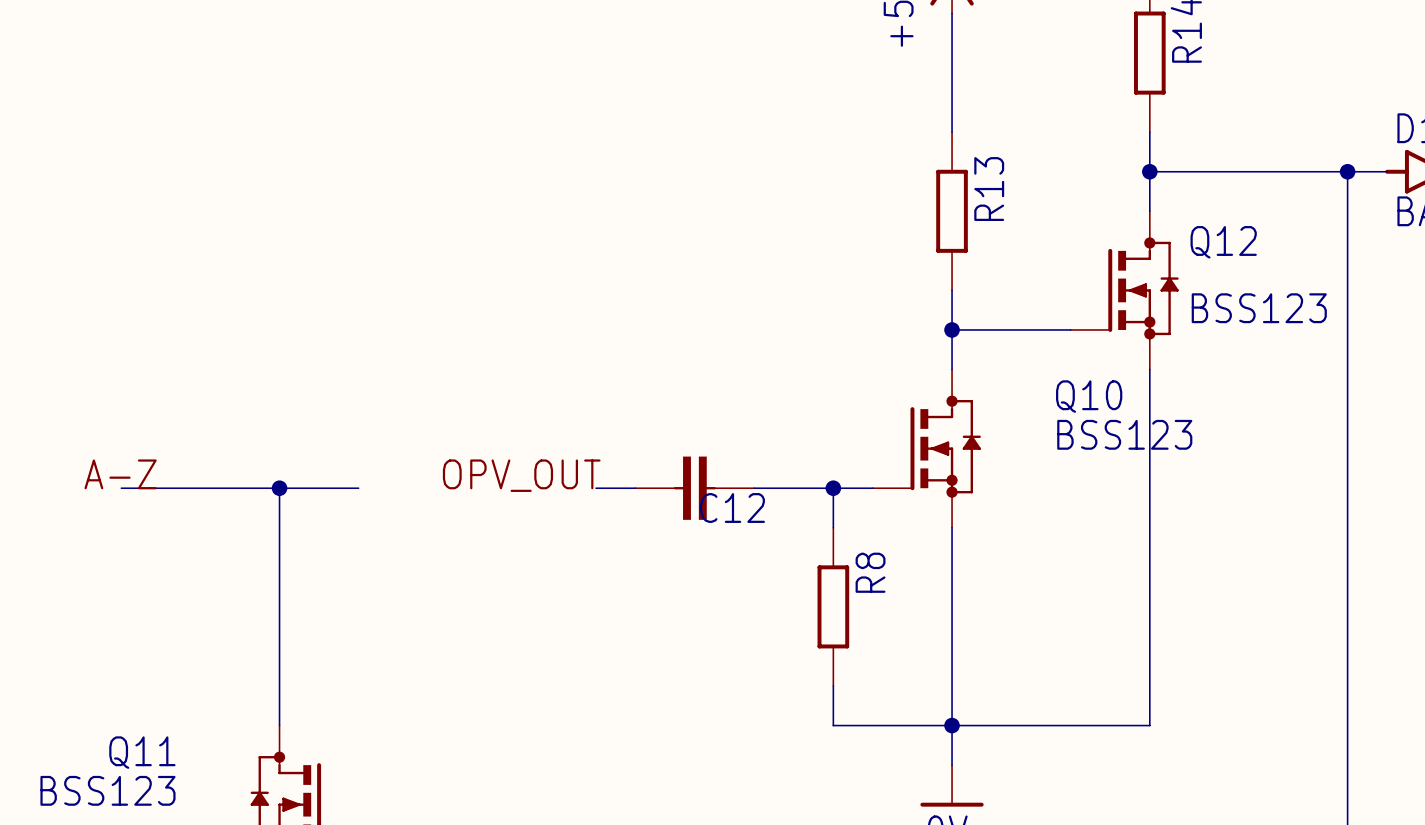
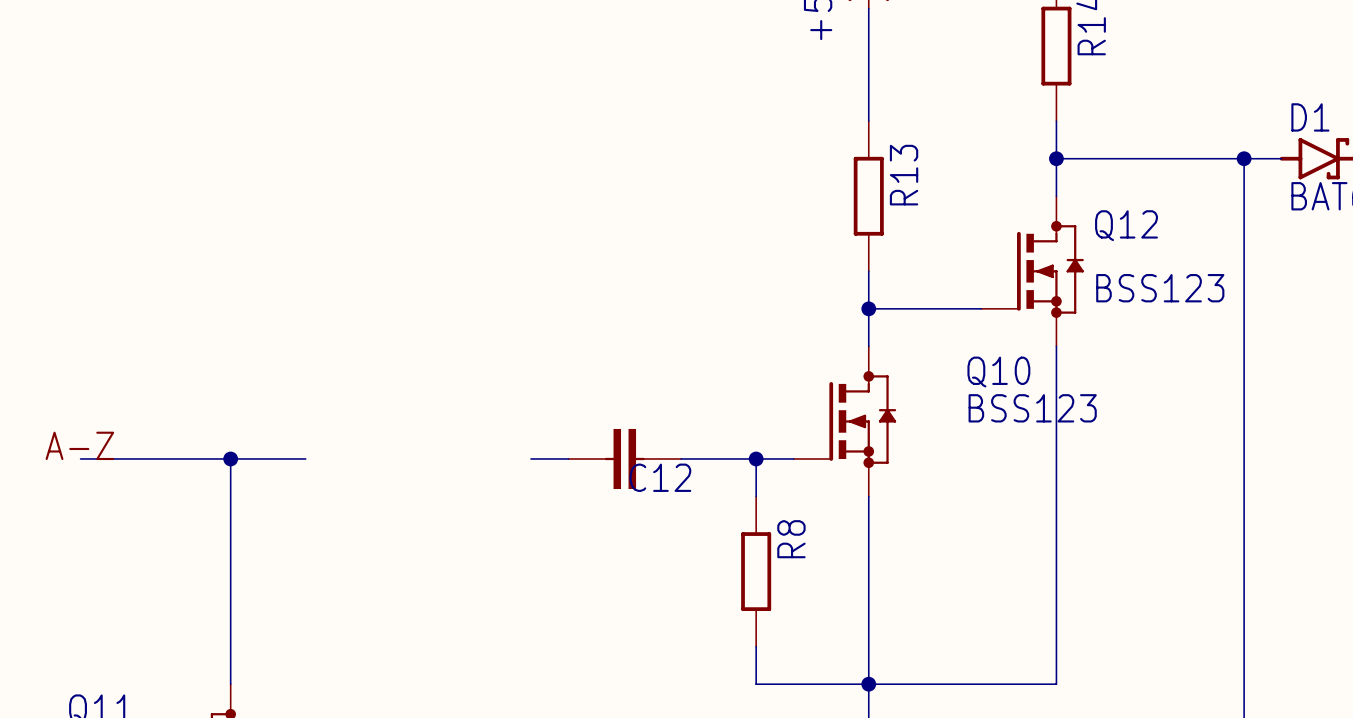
label: OPV_OUT (521, 475) -> none

